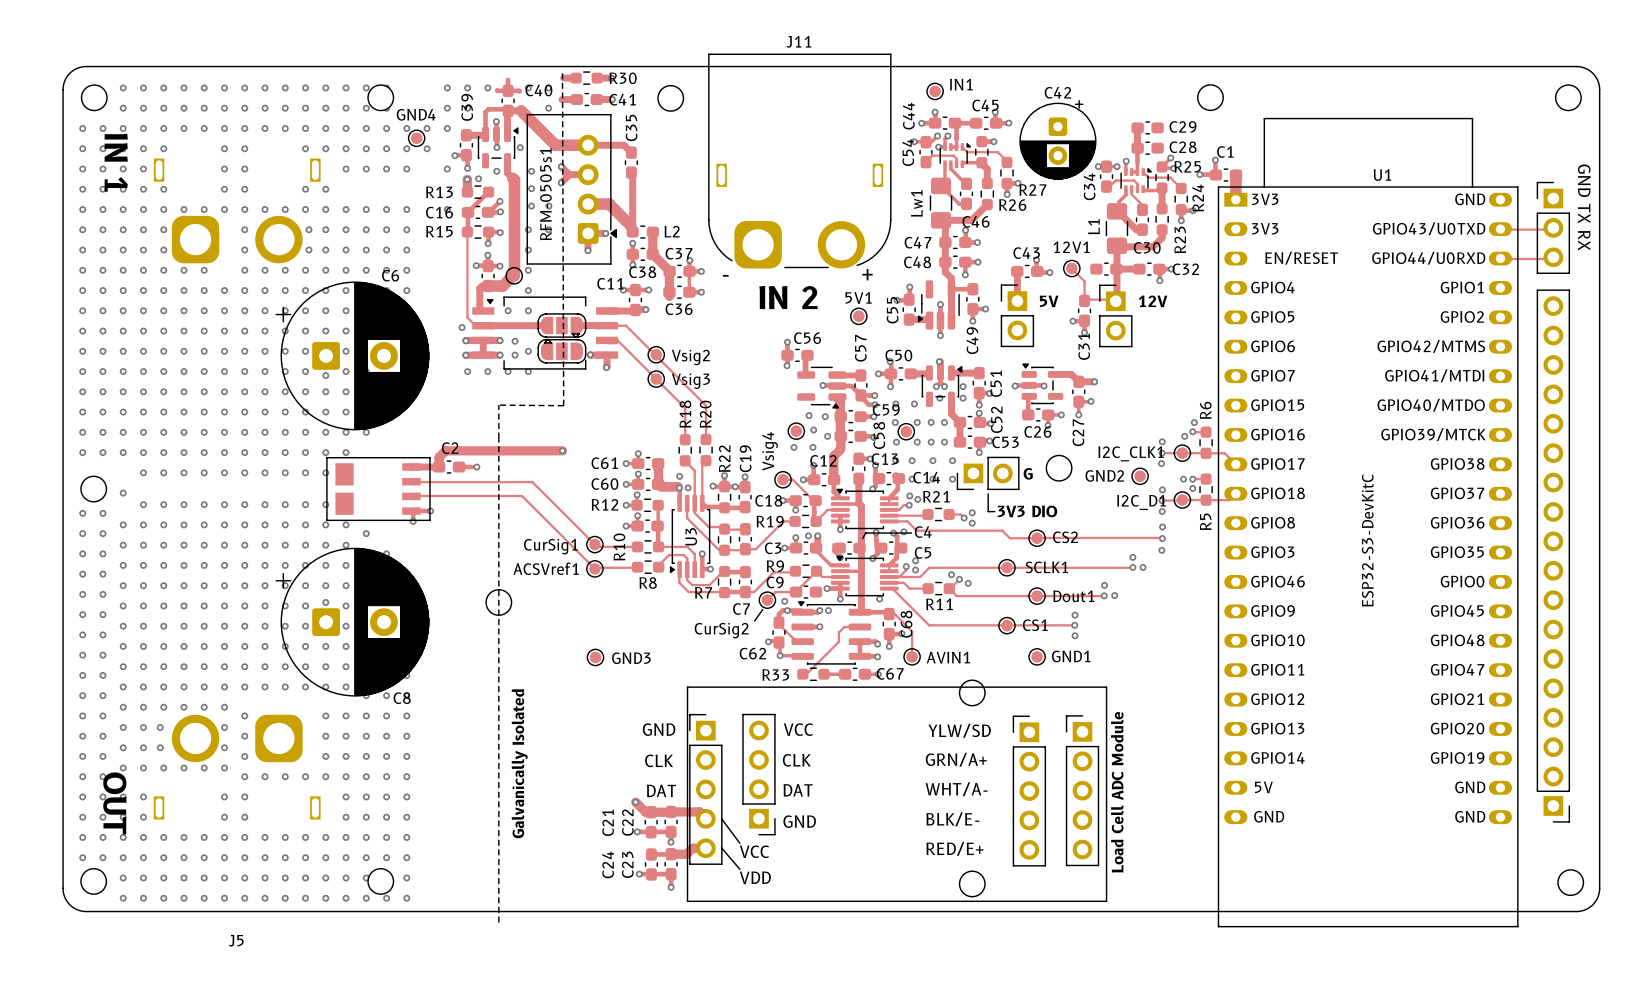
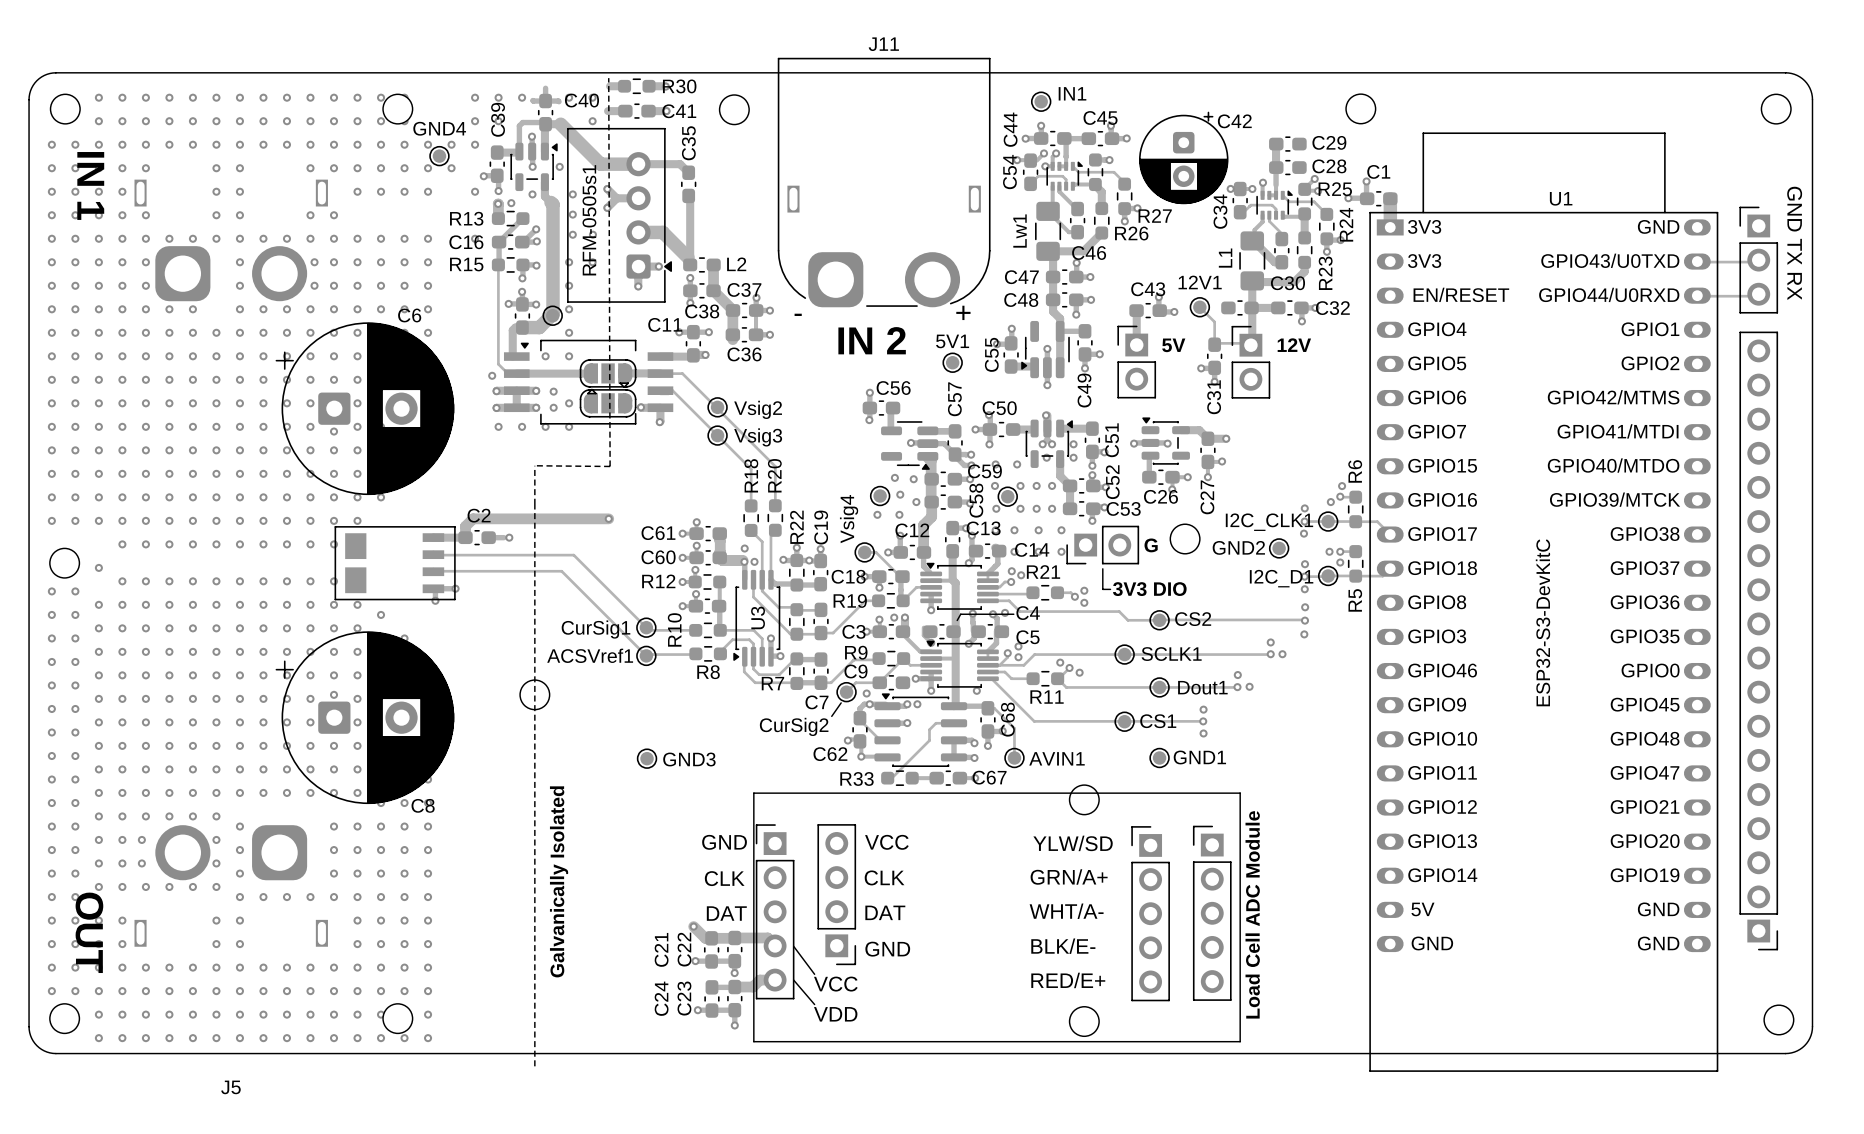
C42 name position: C42 (1057, 92) -> C42 (1234, 121)

